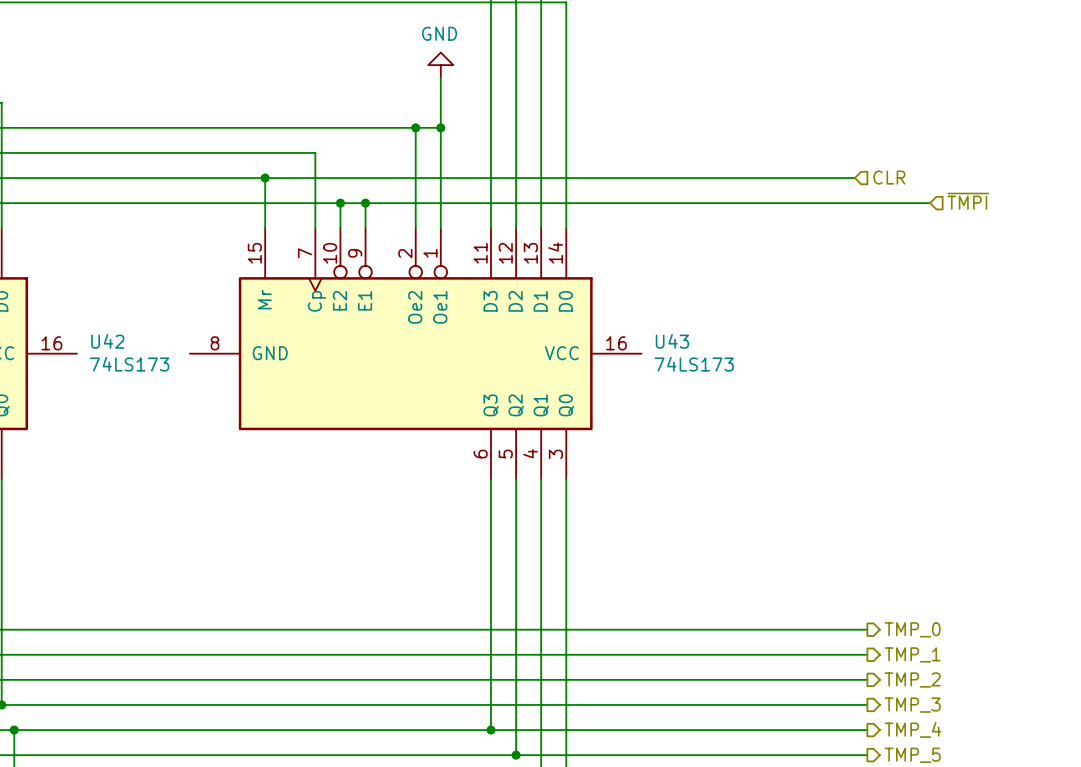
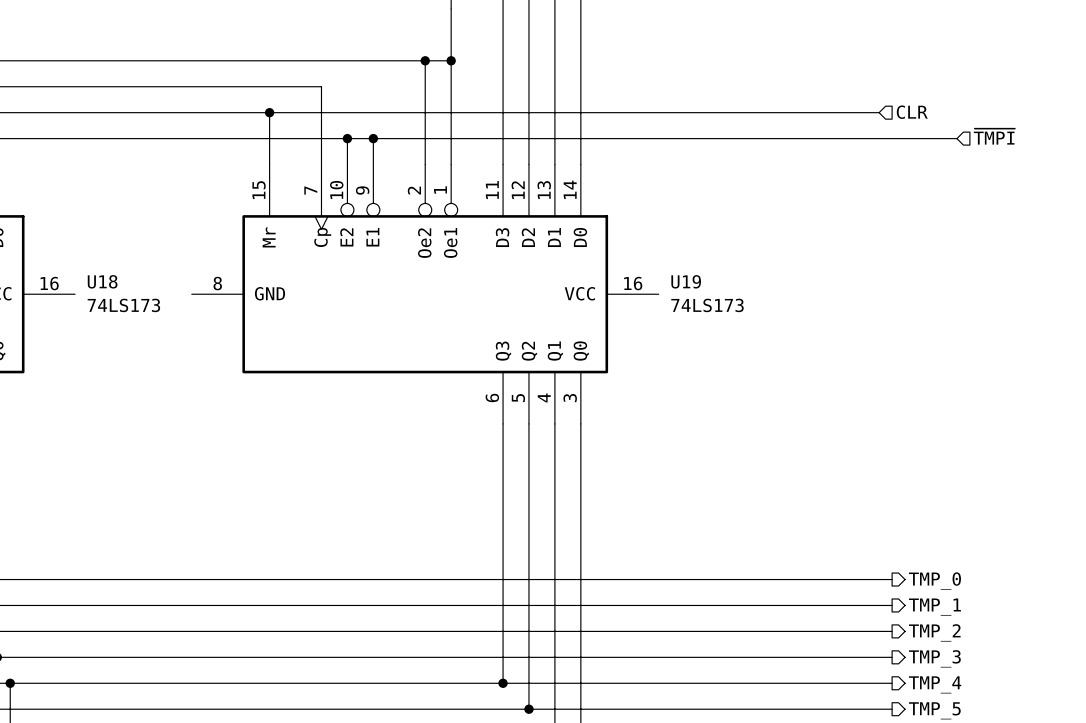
U42 name: U42 (107, 341) -> U18 (102, 281)
U43 name: U43 (672, 341) -> U19 (686, 281)

